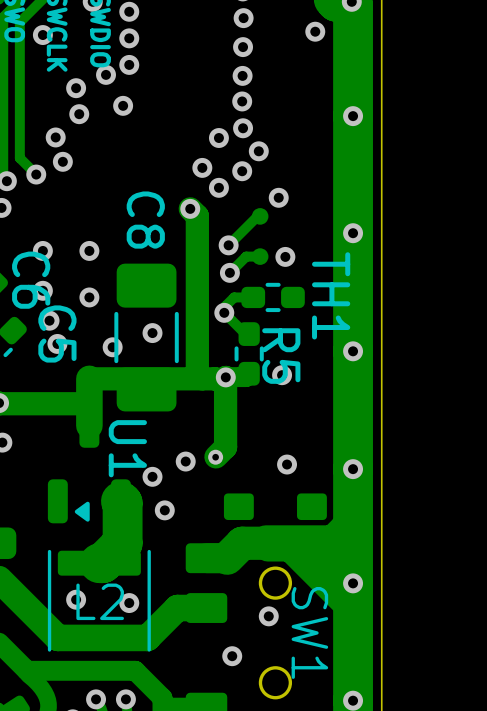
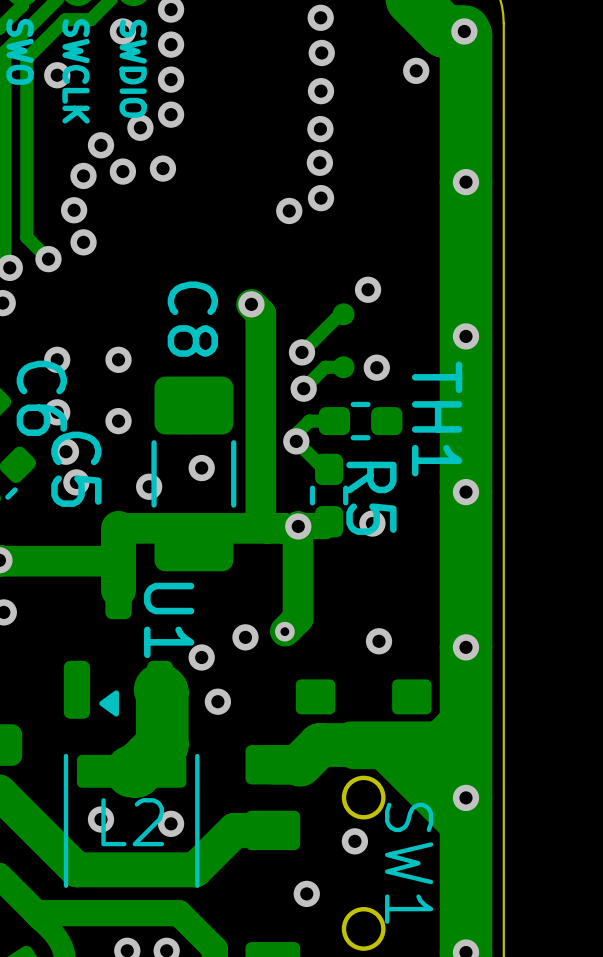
via: none -> (122, 171)
via: none -> (83, 175)
via: (79, 114) -> none
via: (258, 151) -> none
via: (202, 167) -> none
via: (242, 171) -> none
via: (218, 187) -> none

